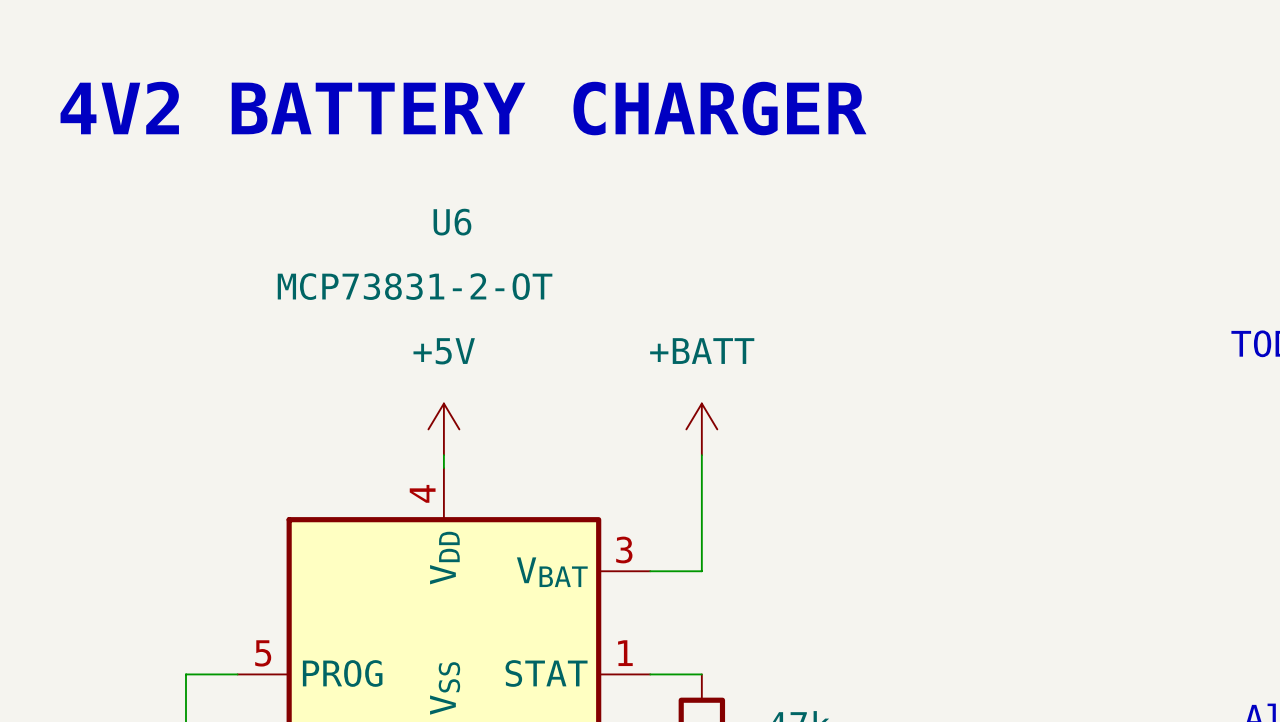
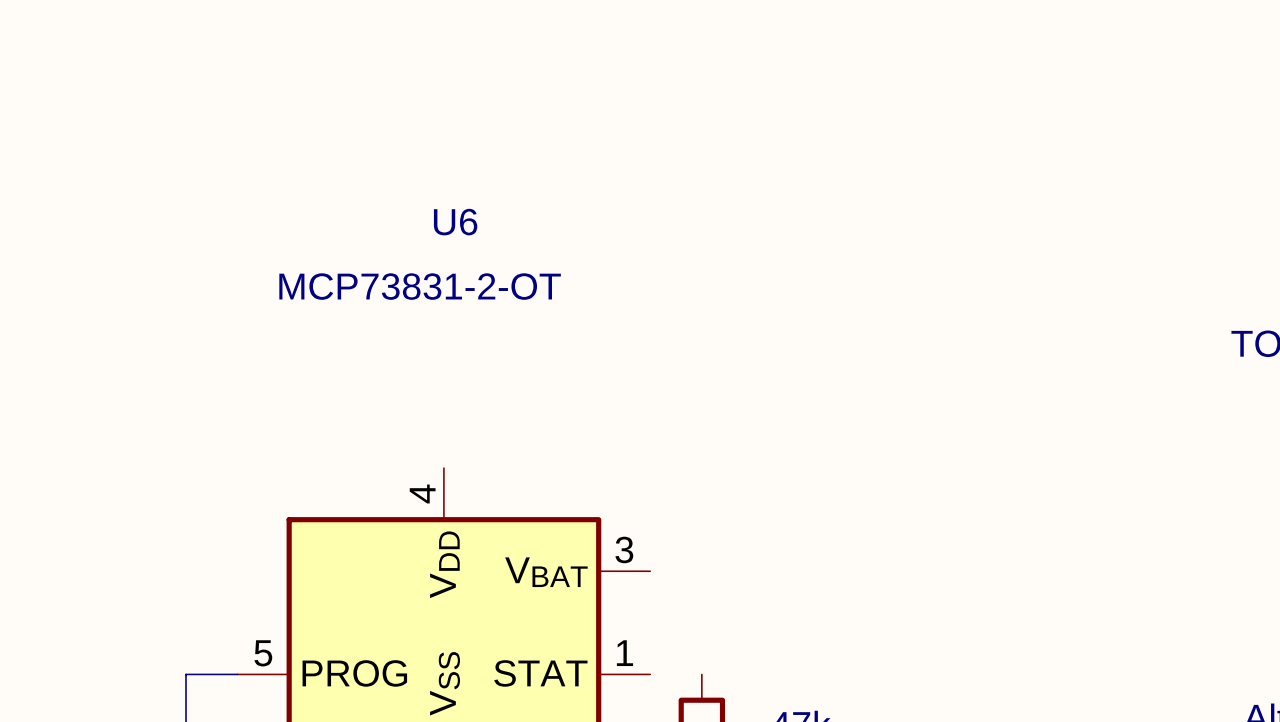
text: 4V2 BATTERY CHARGER (463, 108) -> none
power symbol: +5V (443, 429) -> none
power symbol: +BATT (701, 429) -> none
wire: (443, 455) (443, 468) -> none
wire: (701, 455) (701, 571) (650, 571) -> none
wire: (650, 674) (701, 674) -> none

